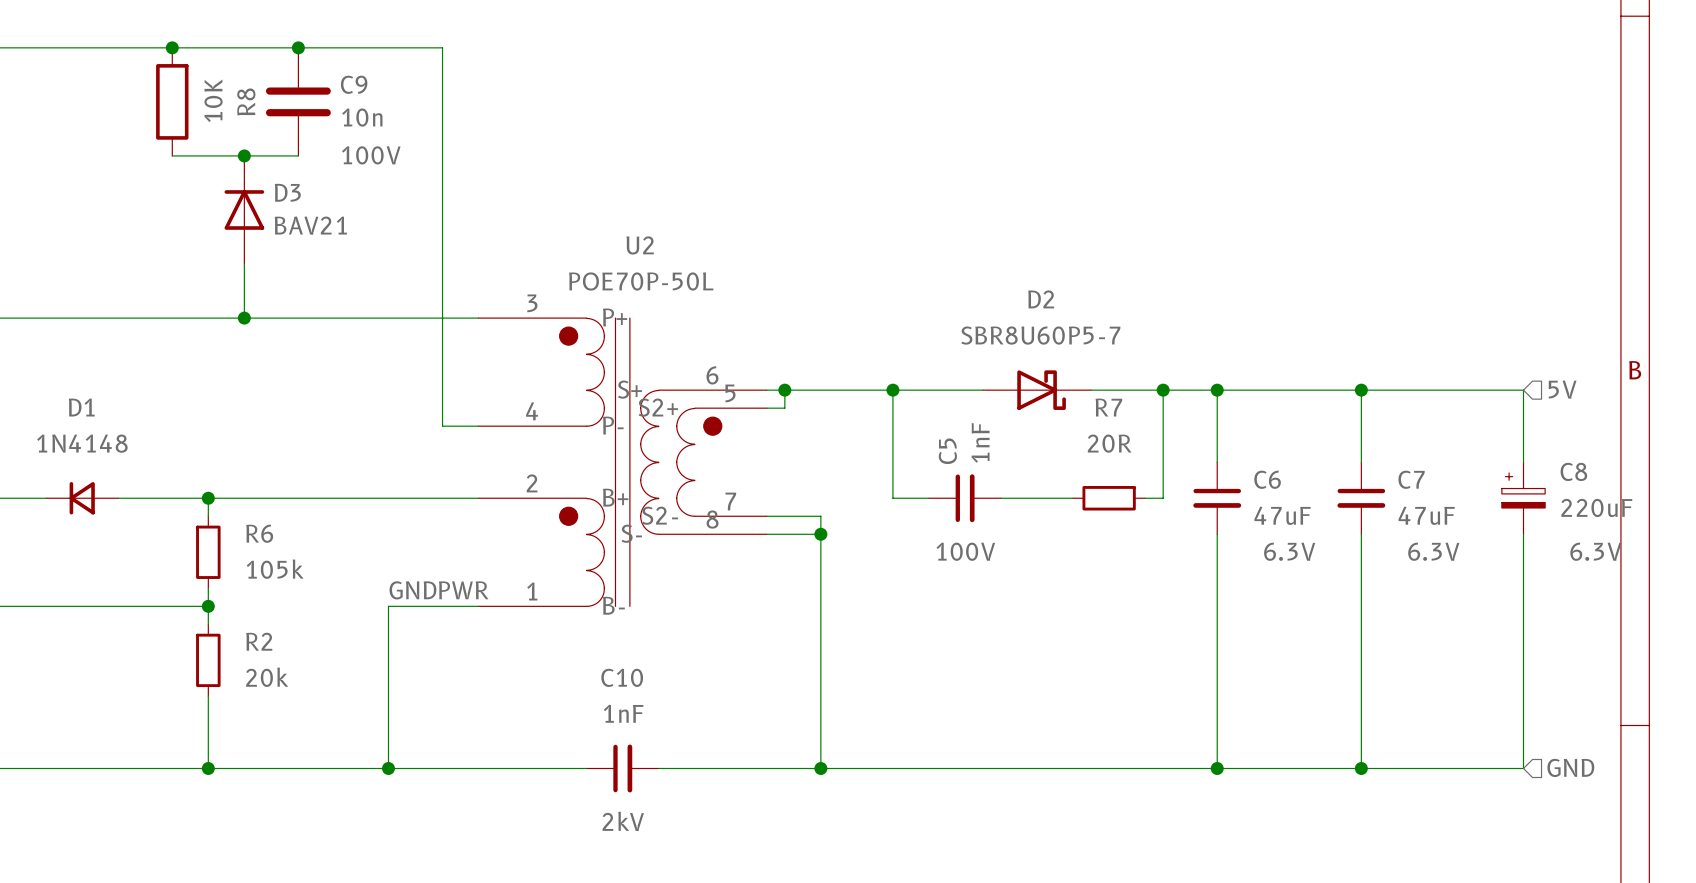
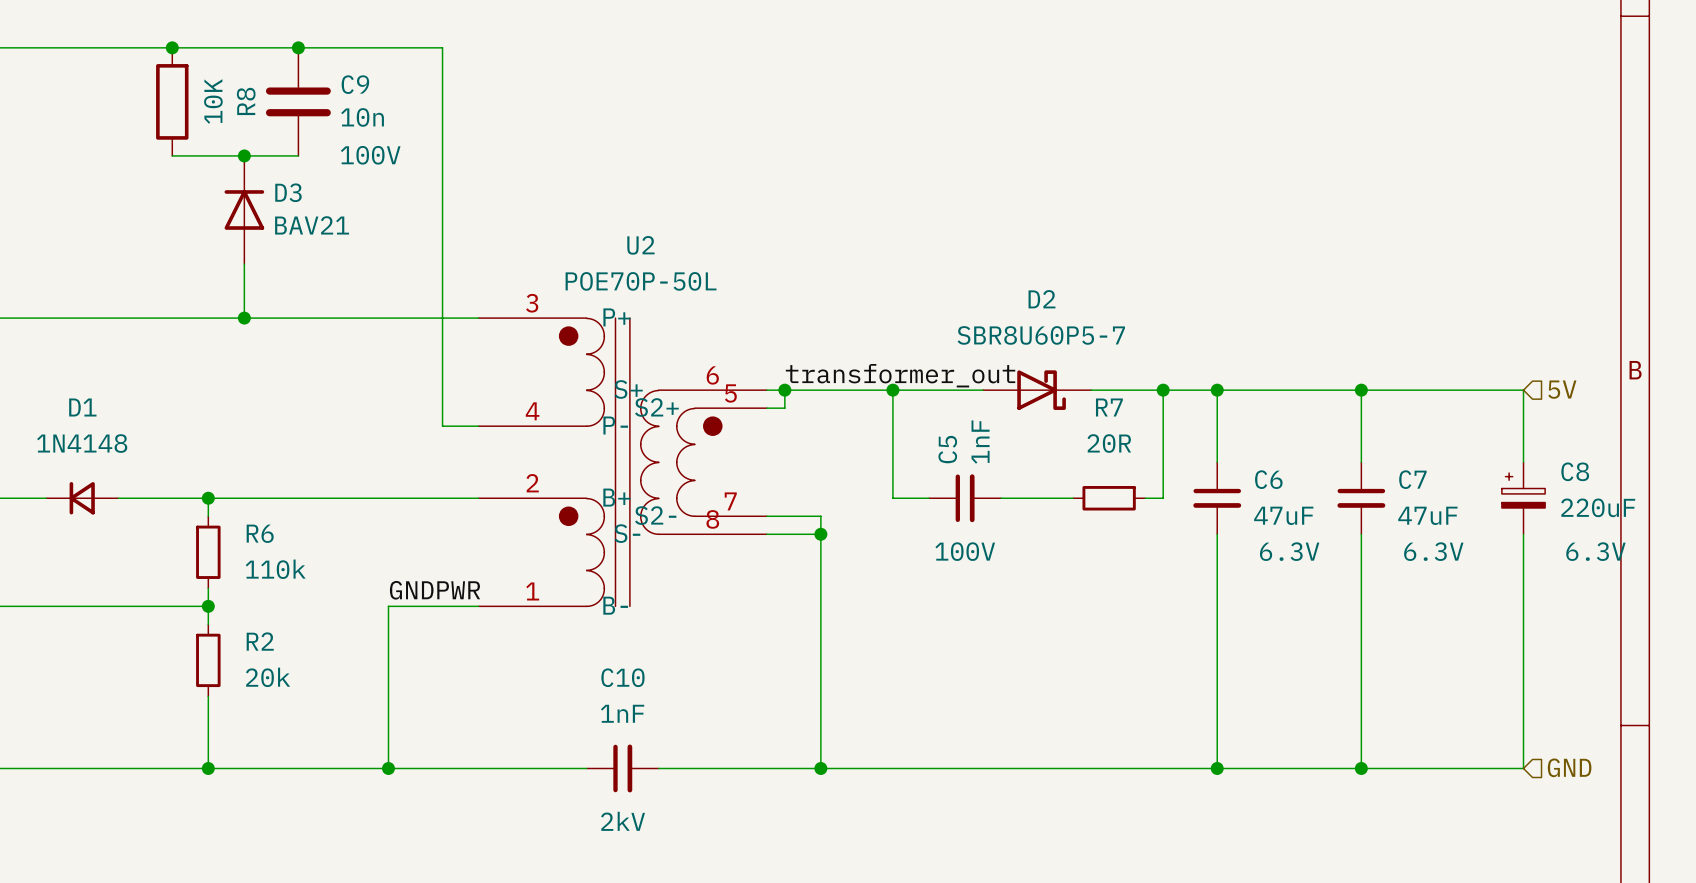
label: none -> transformer_out (900, 375)
R6 value: 105k (275, 569) -> 110k (275, 569)

